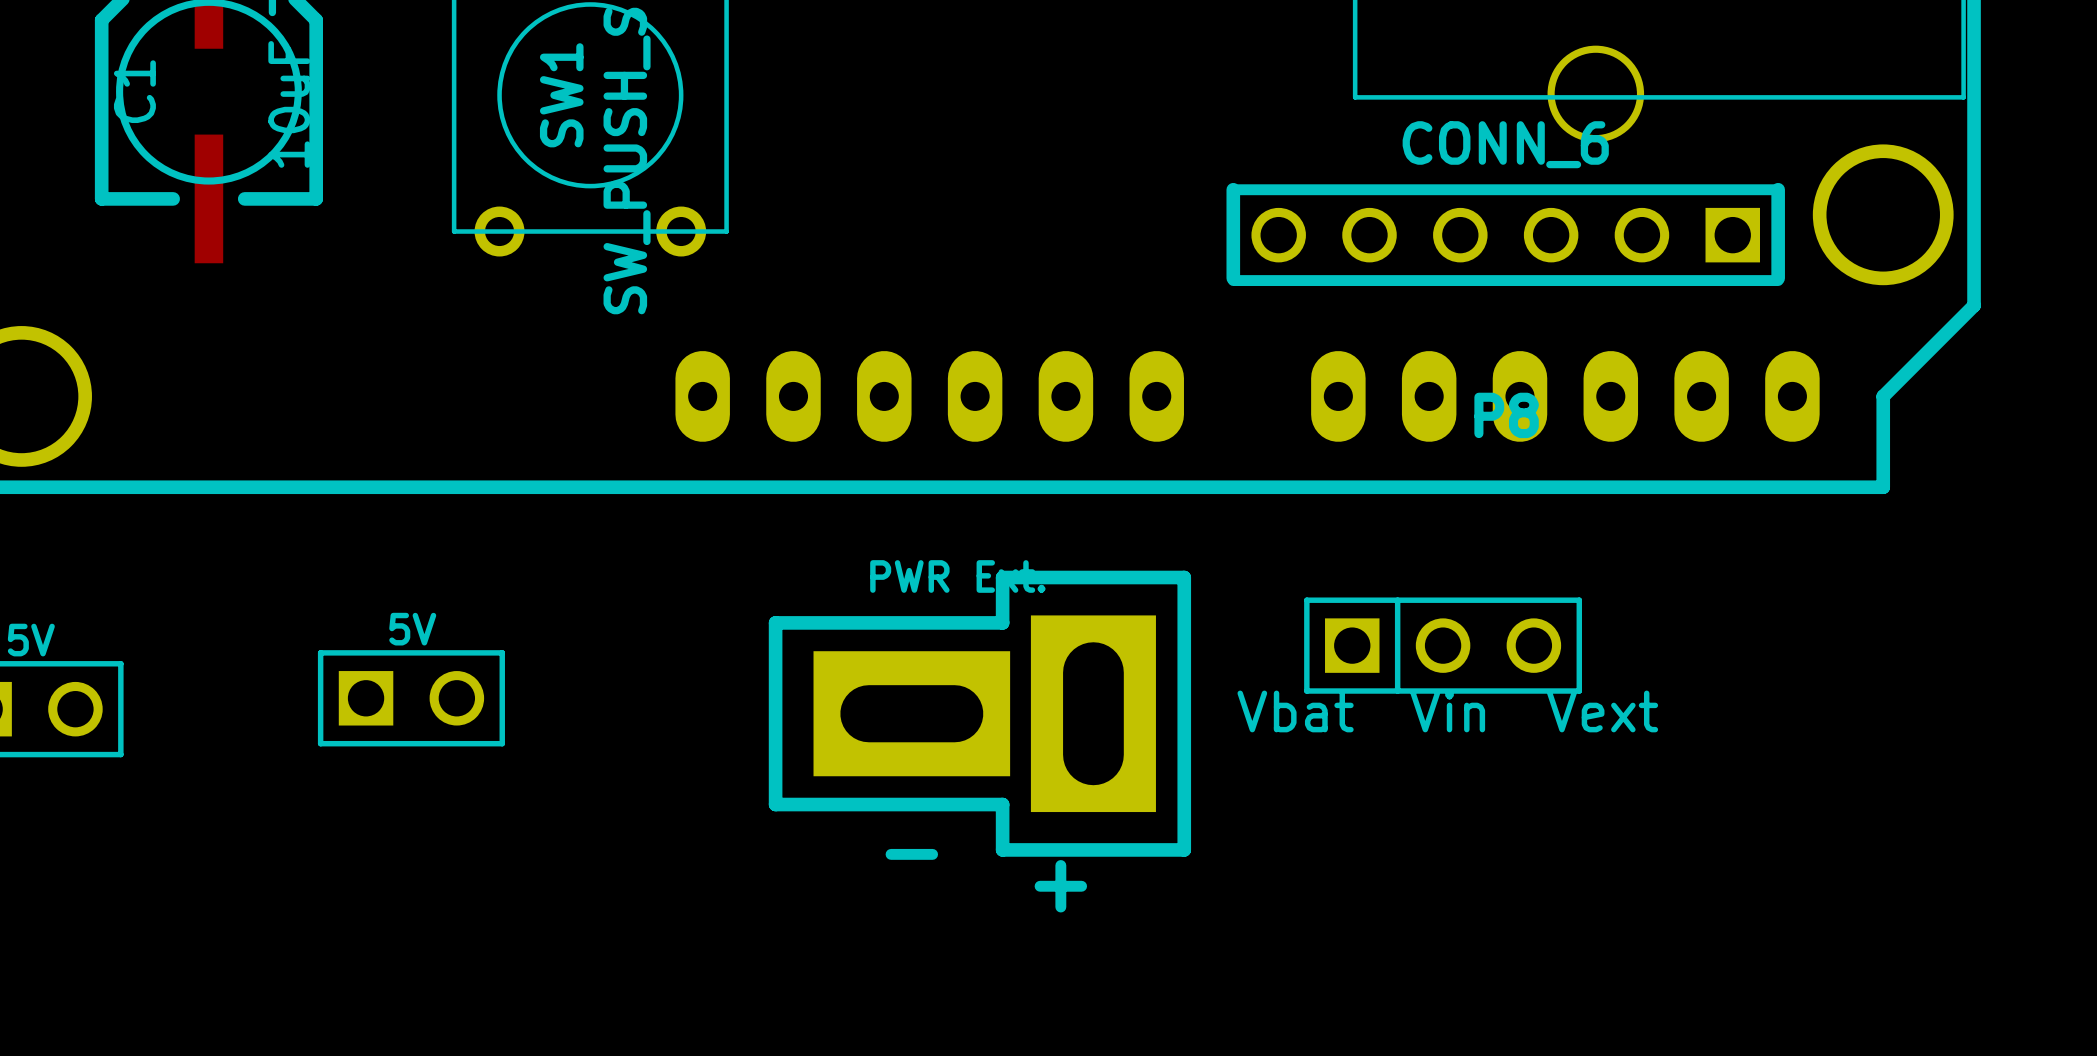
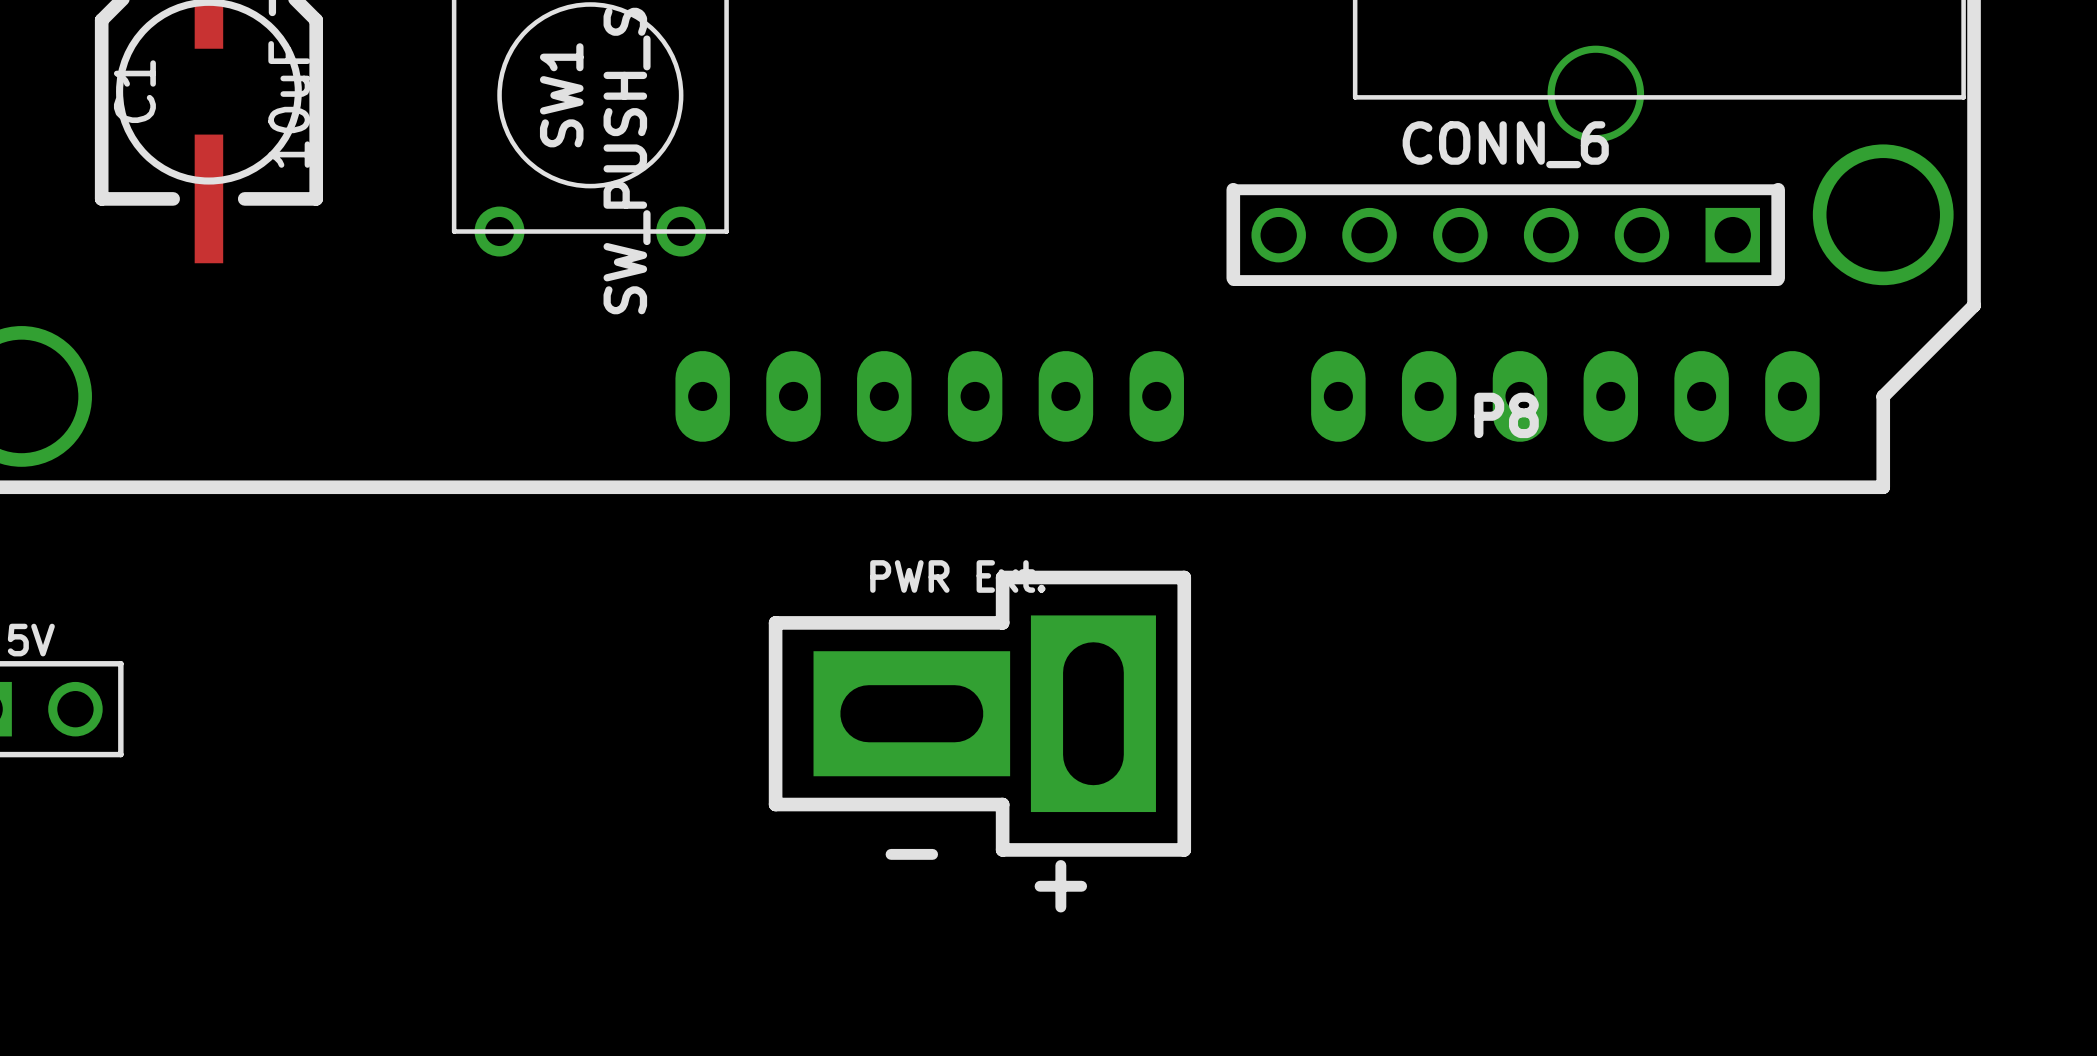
part: Vbat Vin Vext (1443, 645) -> none
5V: (411, 698) -> none

